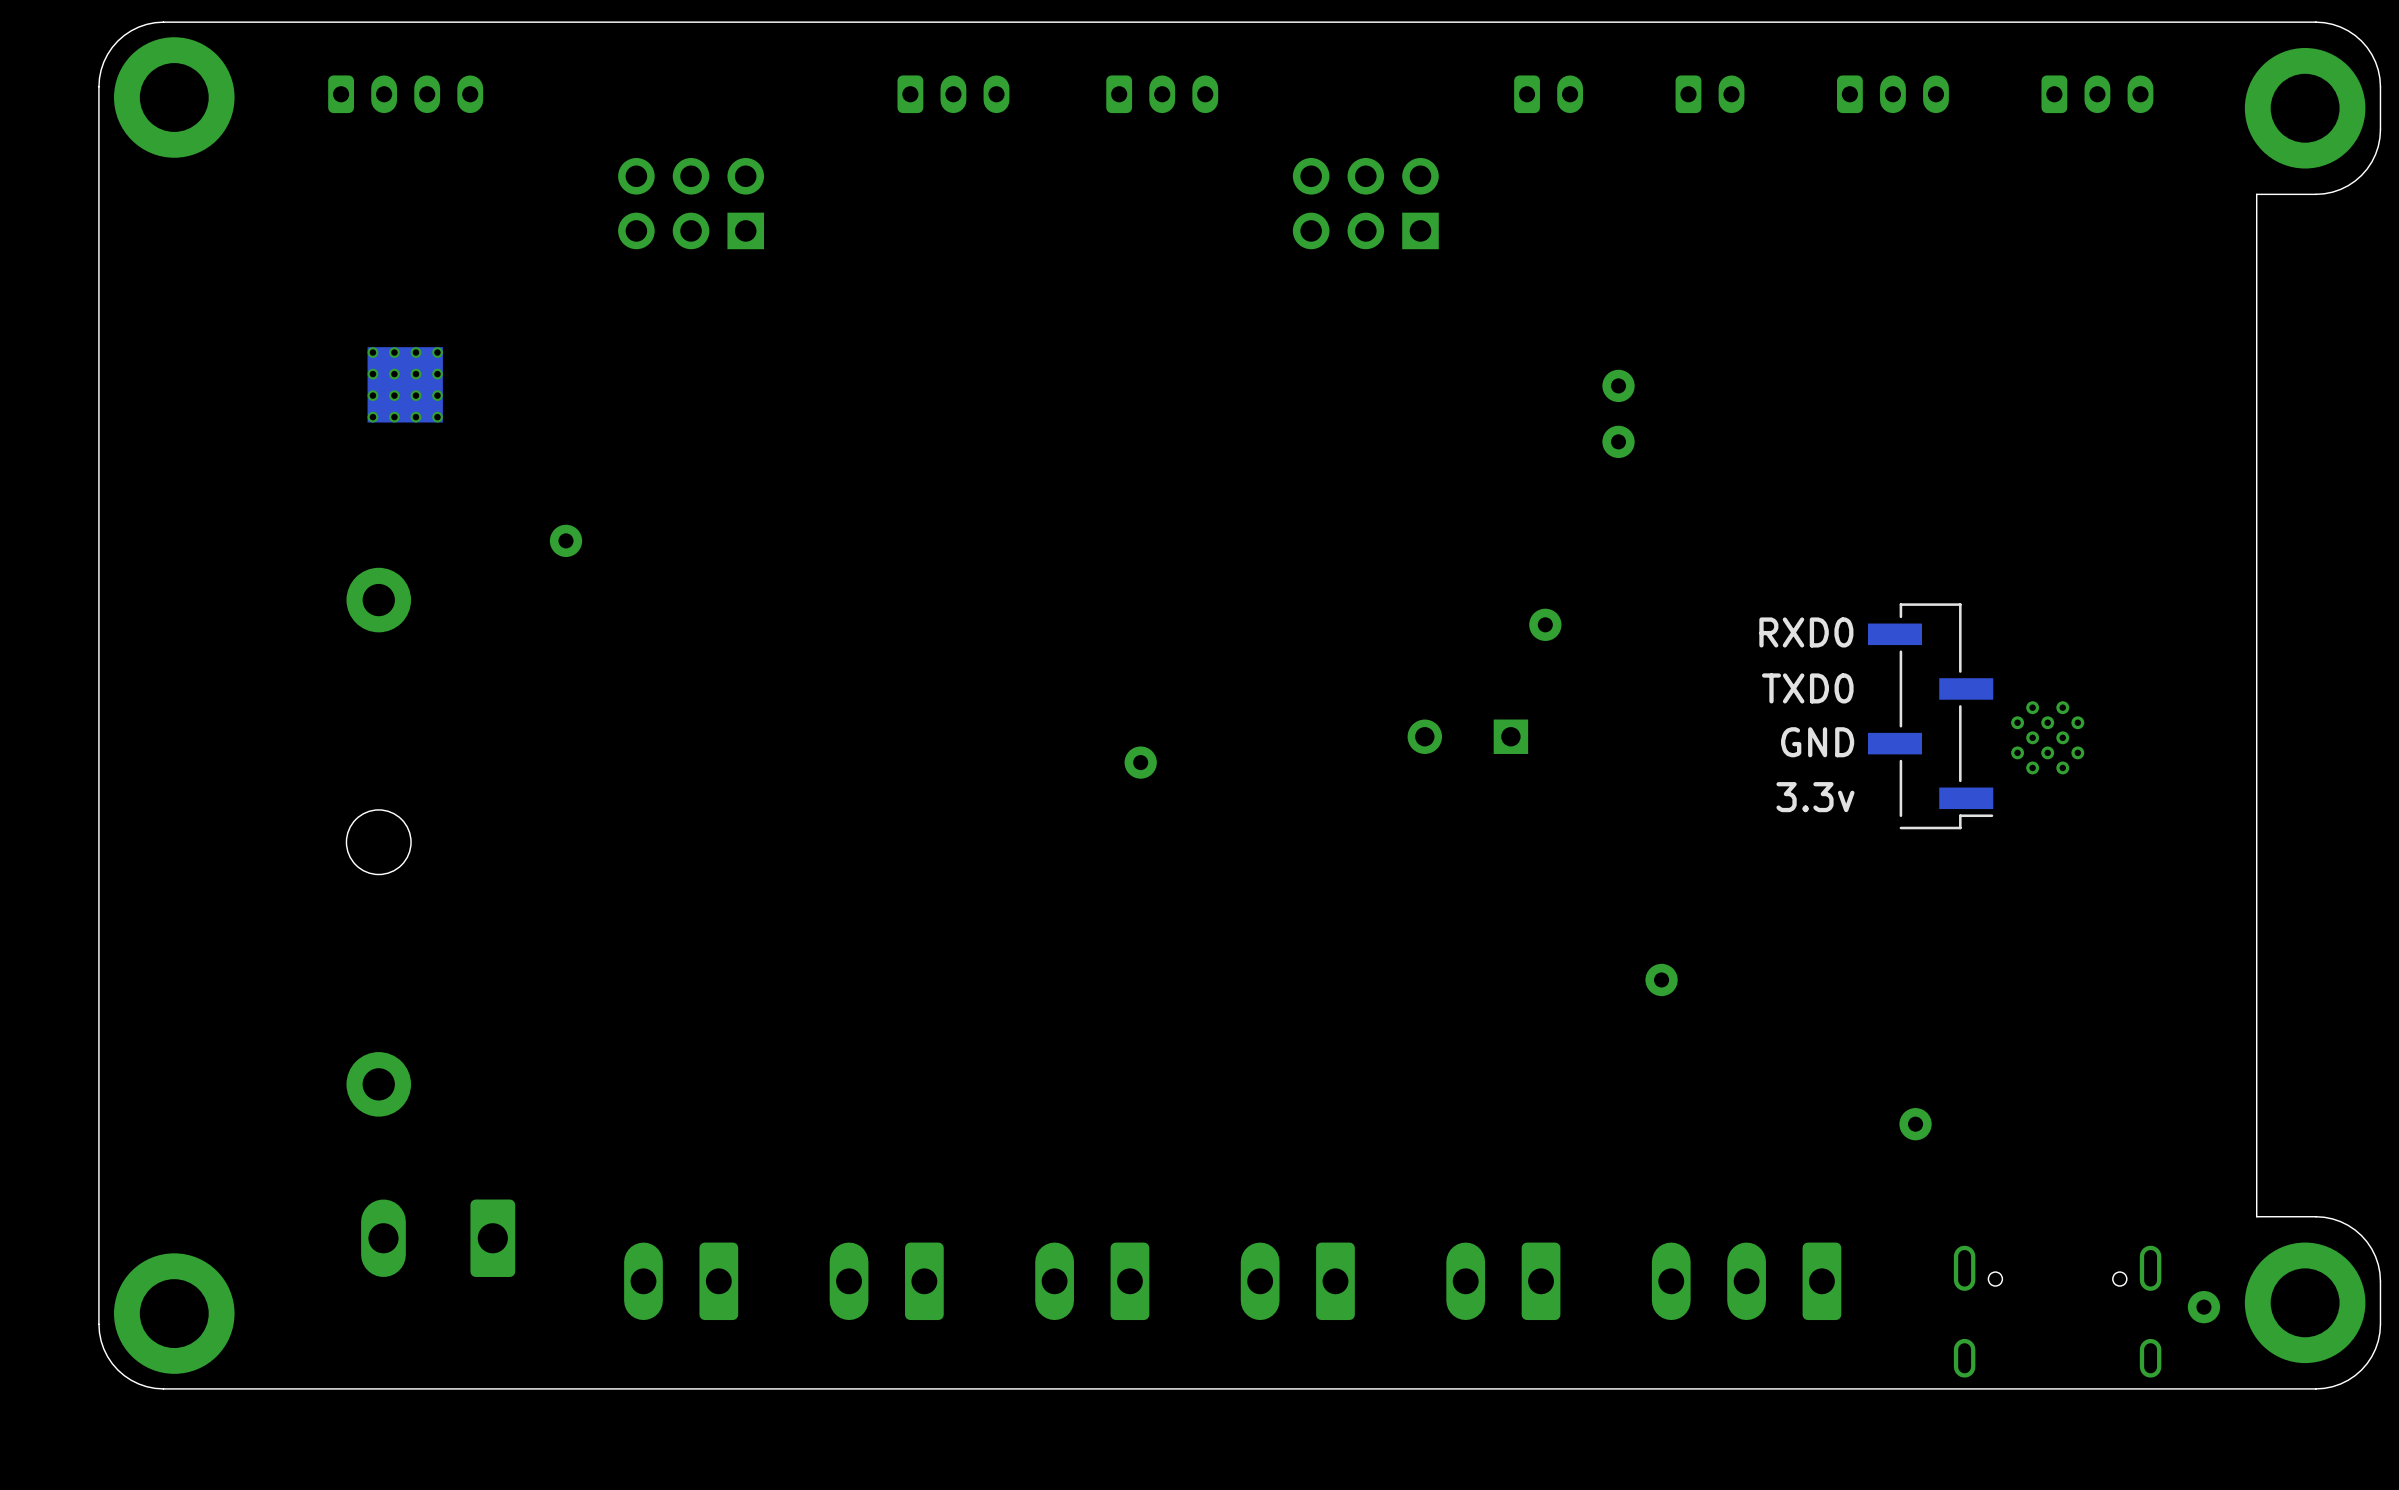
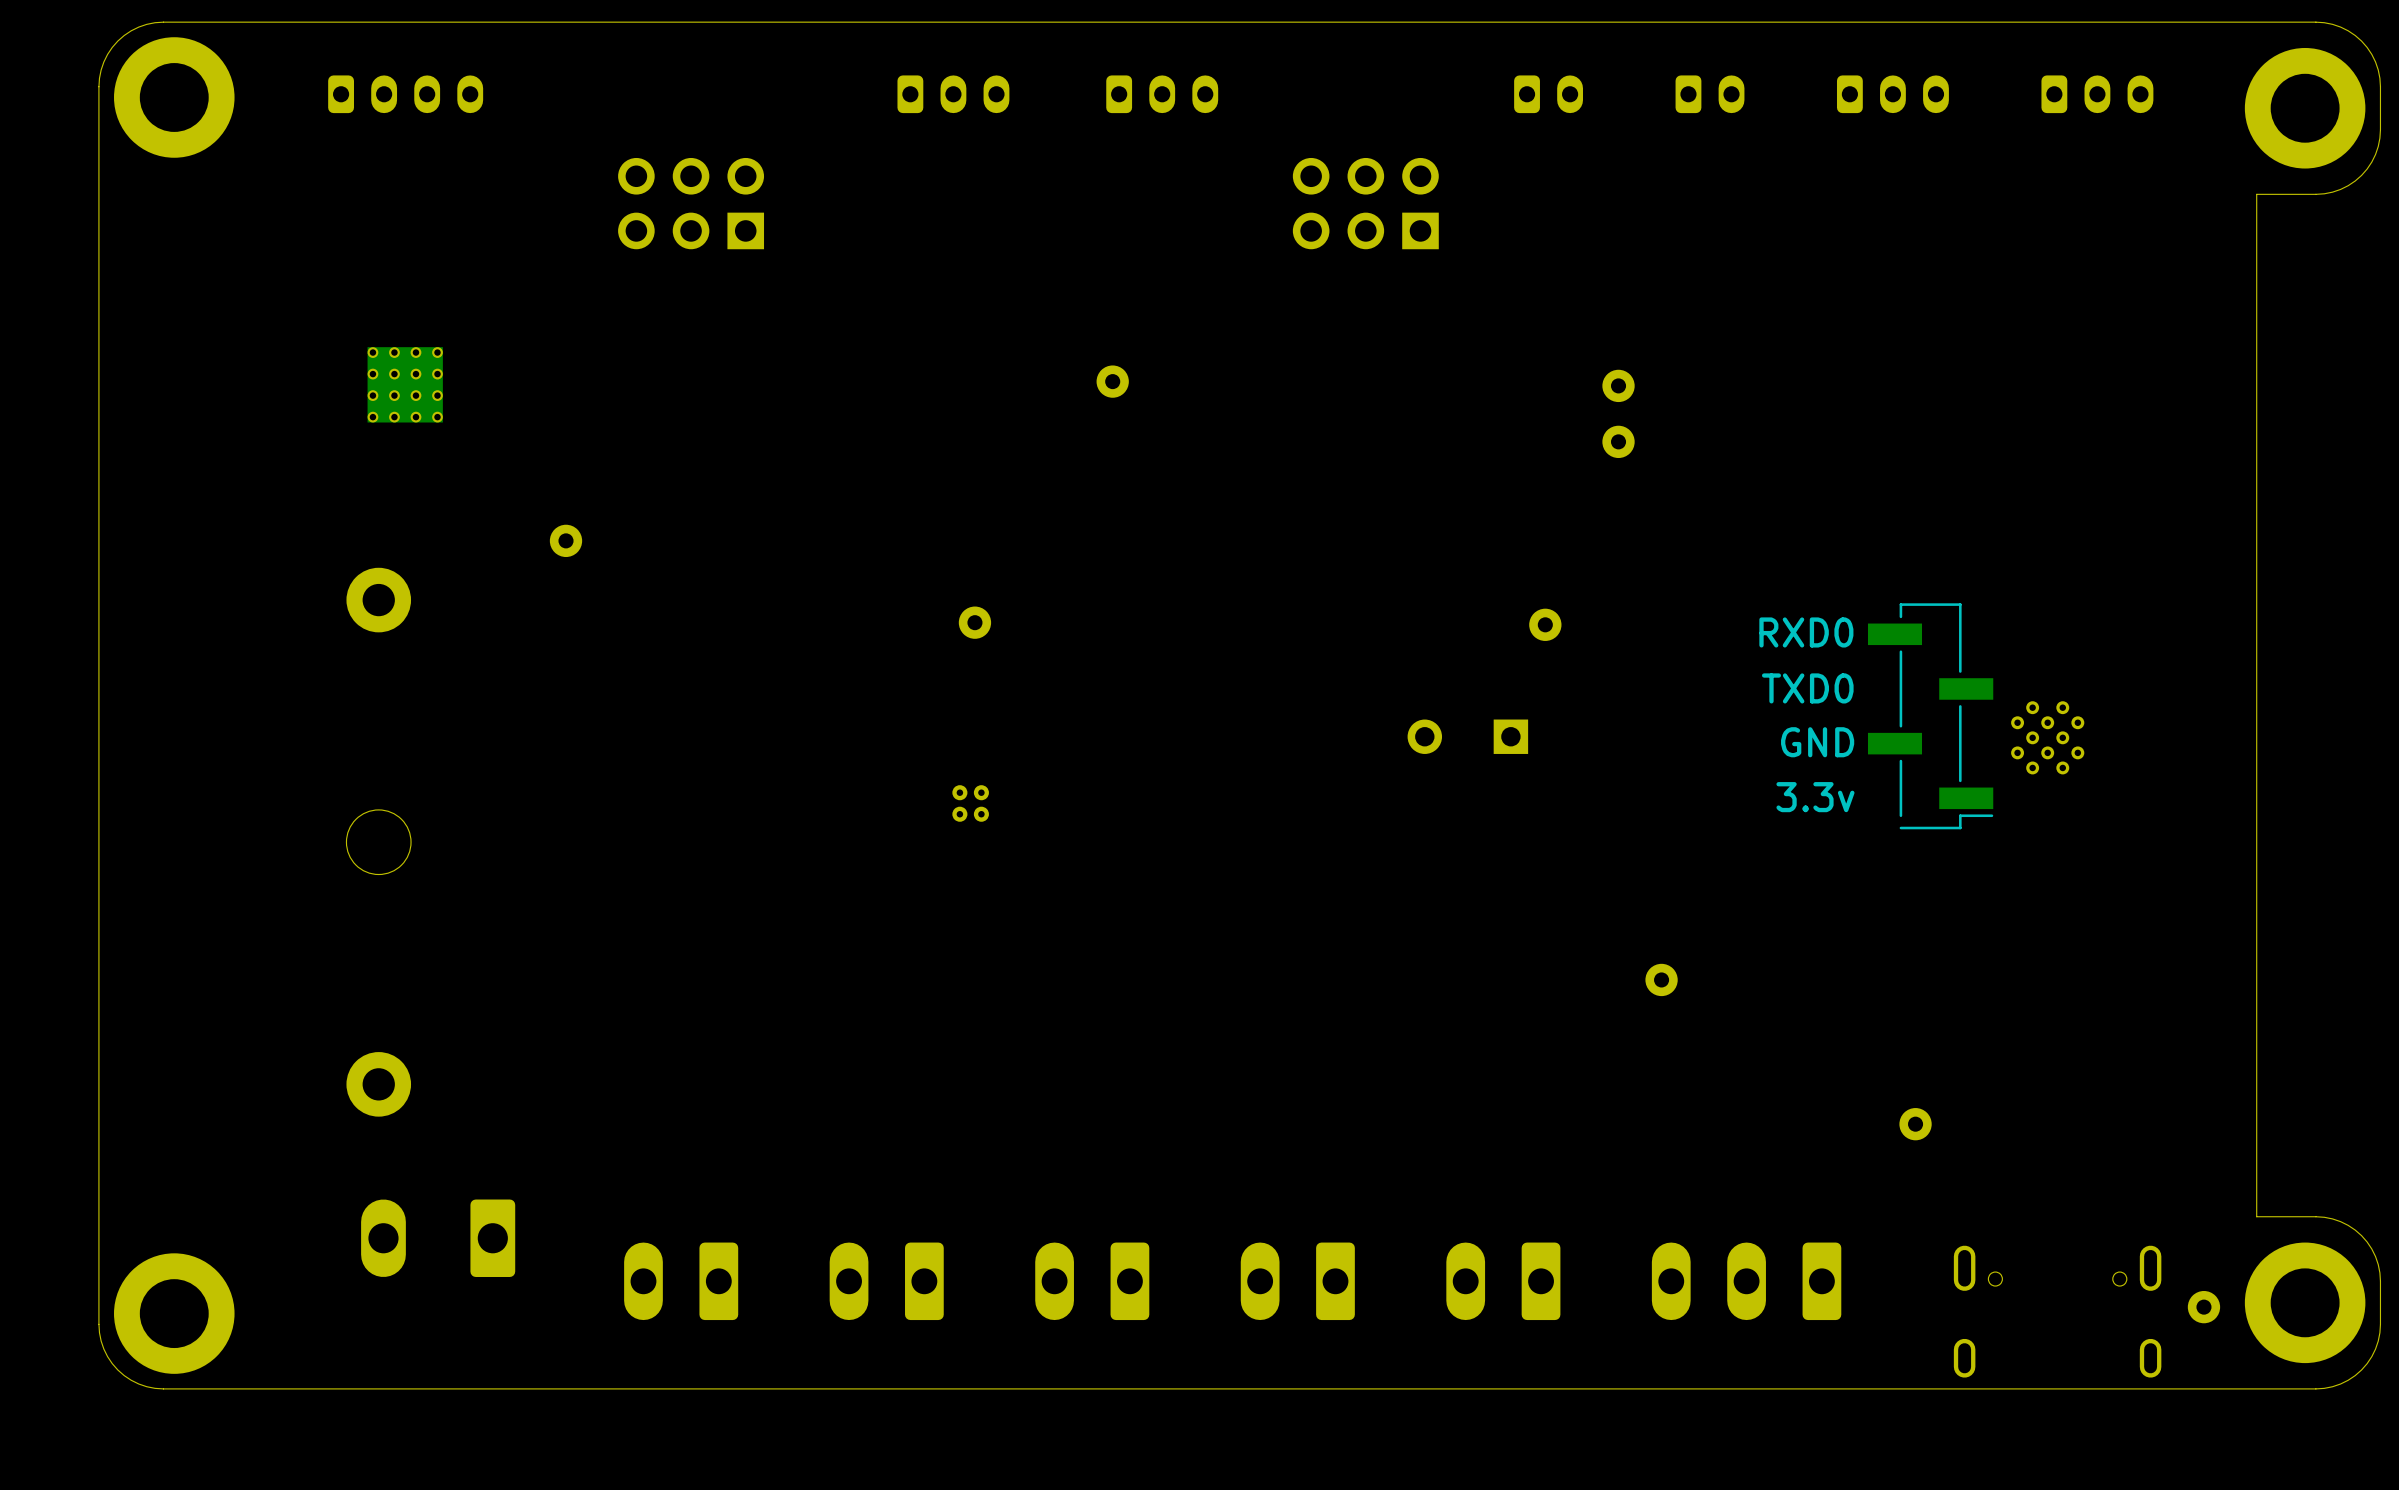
part: none -> (1112, 381)
part: none -> (974, 622)
part: (1140, 762) -> none
part: none -> (970, 803)

